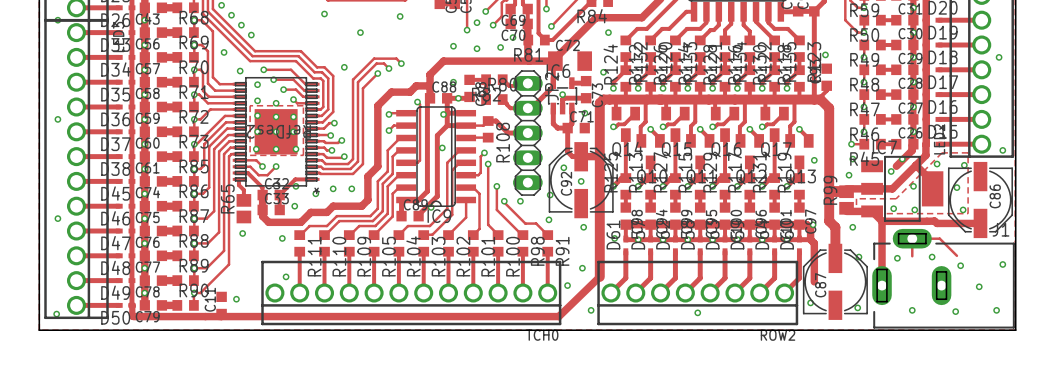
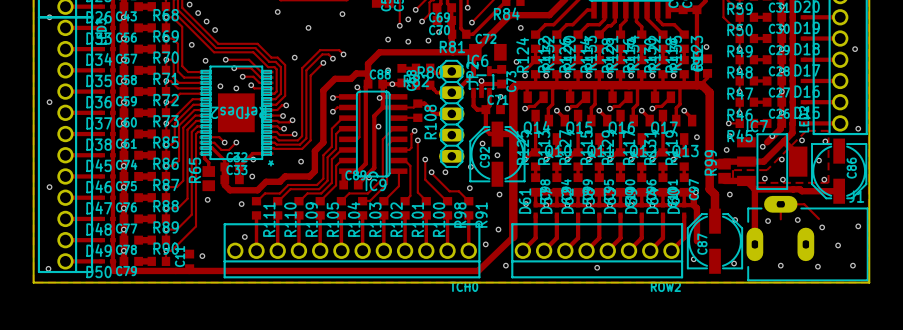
via: (257, 84) -> none
zone outline: (250, 105) (250, 155) (303, 155) (303, 105) (250, 105) -> none
via: (257, 115) -> none
via: (276, 116) -> none
via: (293, 116) -> none
via: (257, 131) -> none
via: (276, 131) -> none
via: (293, 131) -> none
via: (256, 149) -> none
via: (276, 149) -> none
via: (295, 149) -> none
via: (333, 188) -> none
via: (315, 193) -> none

